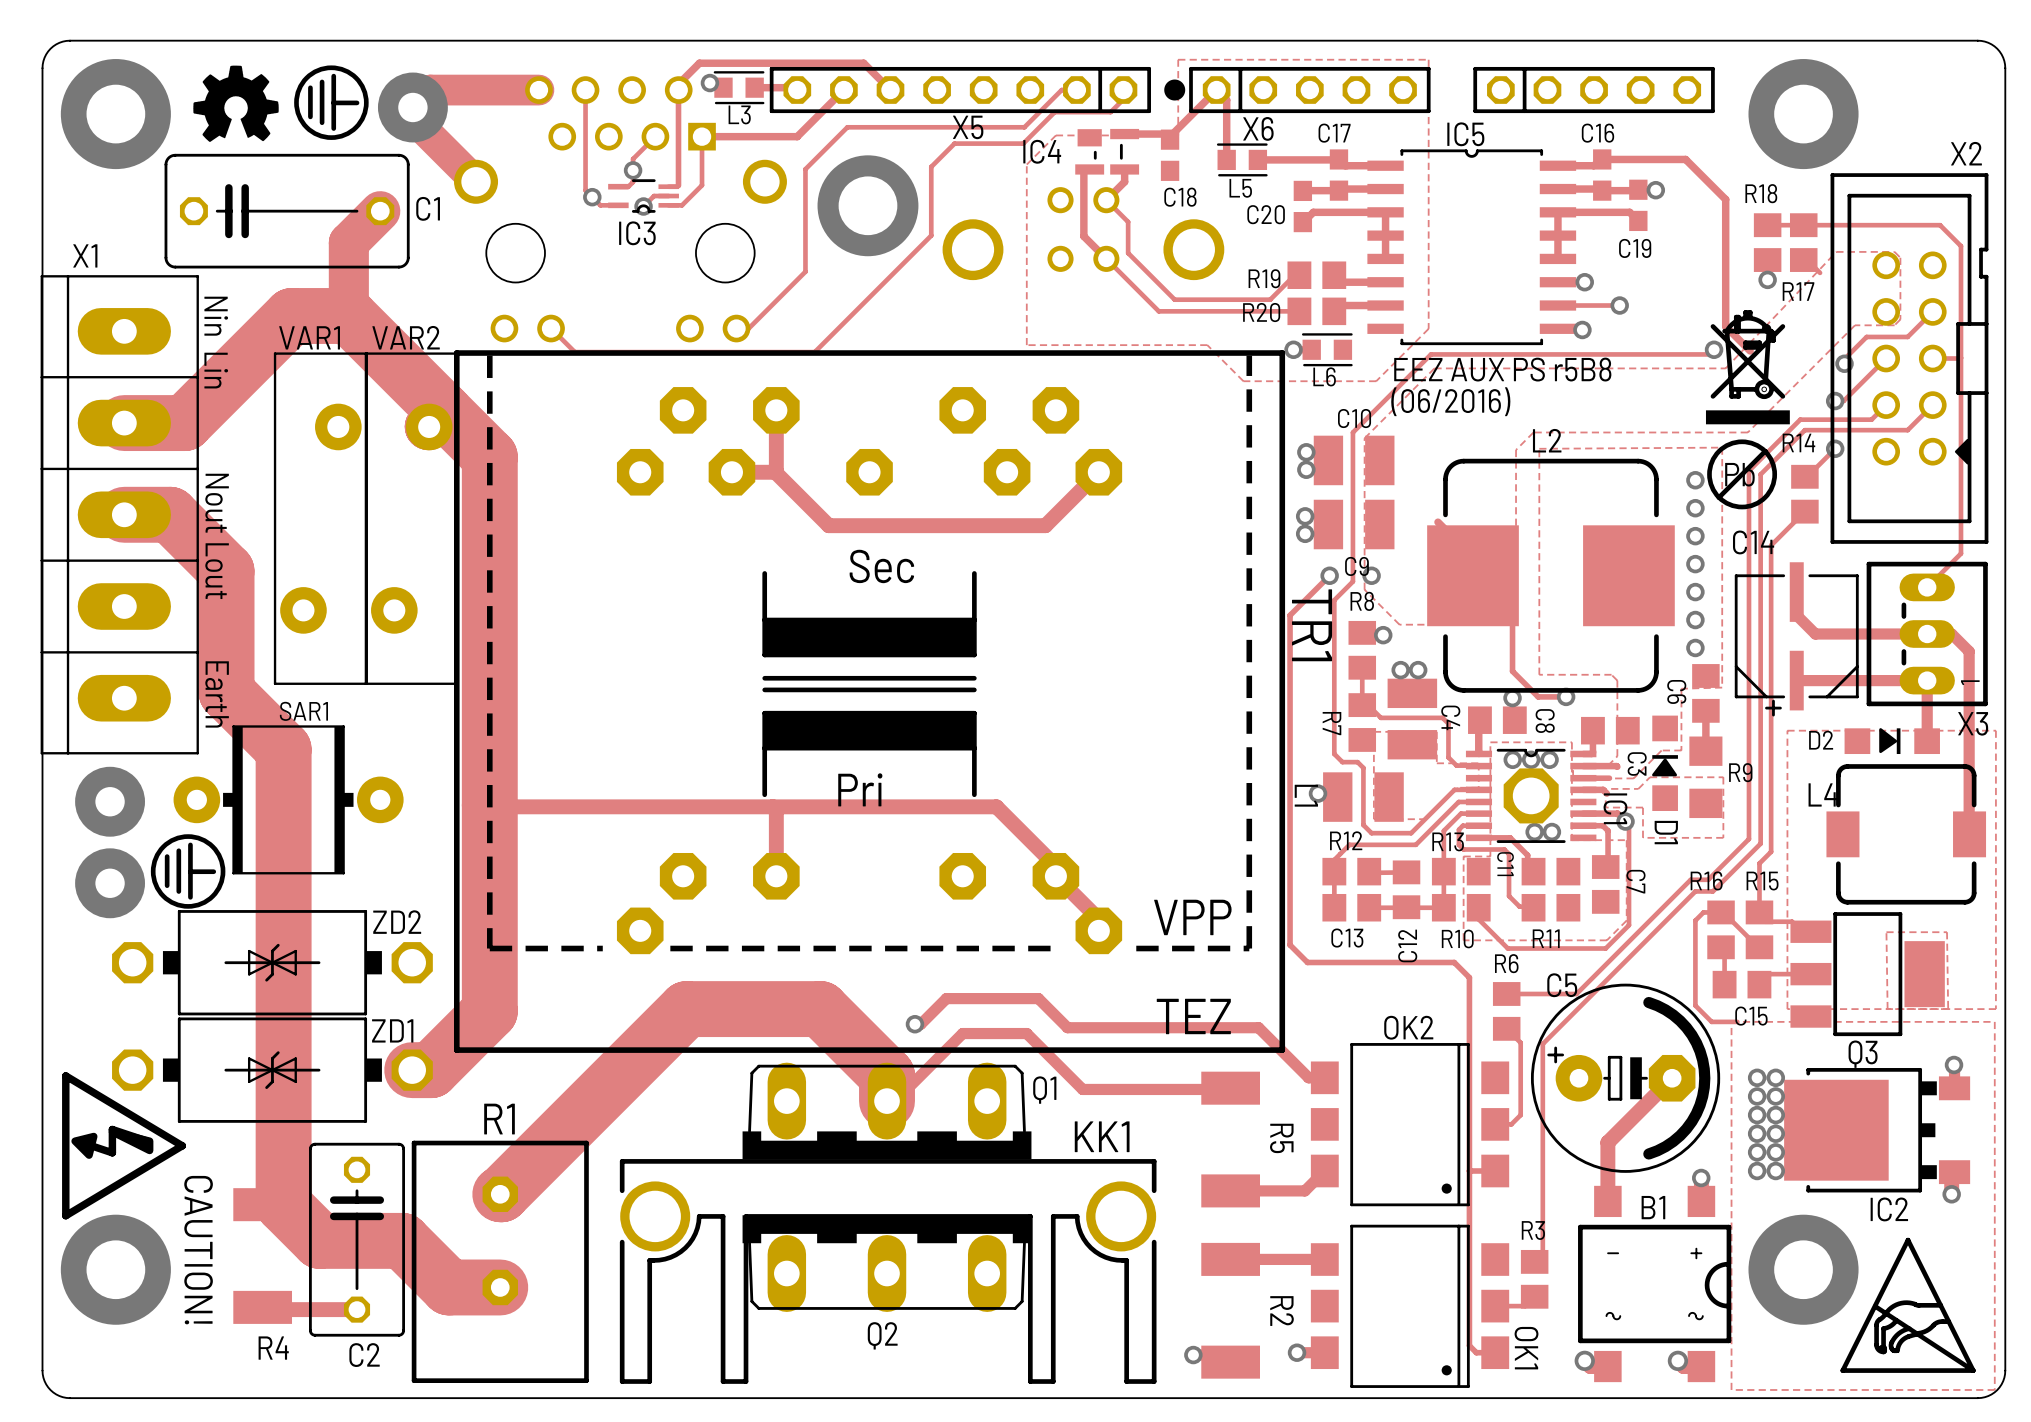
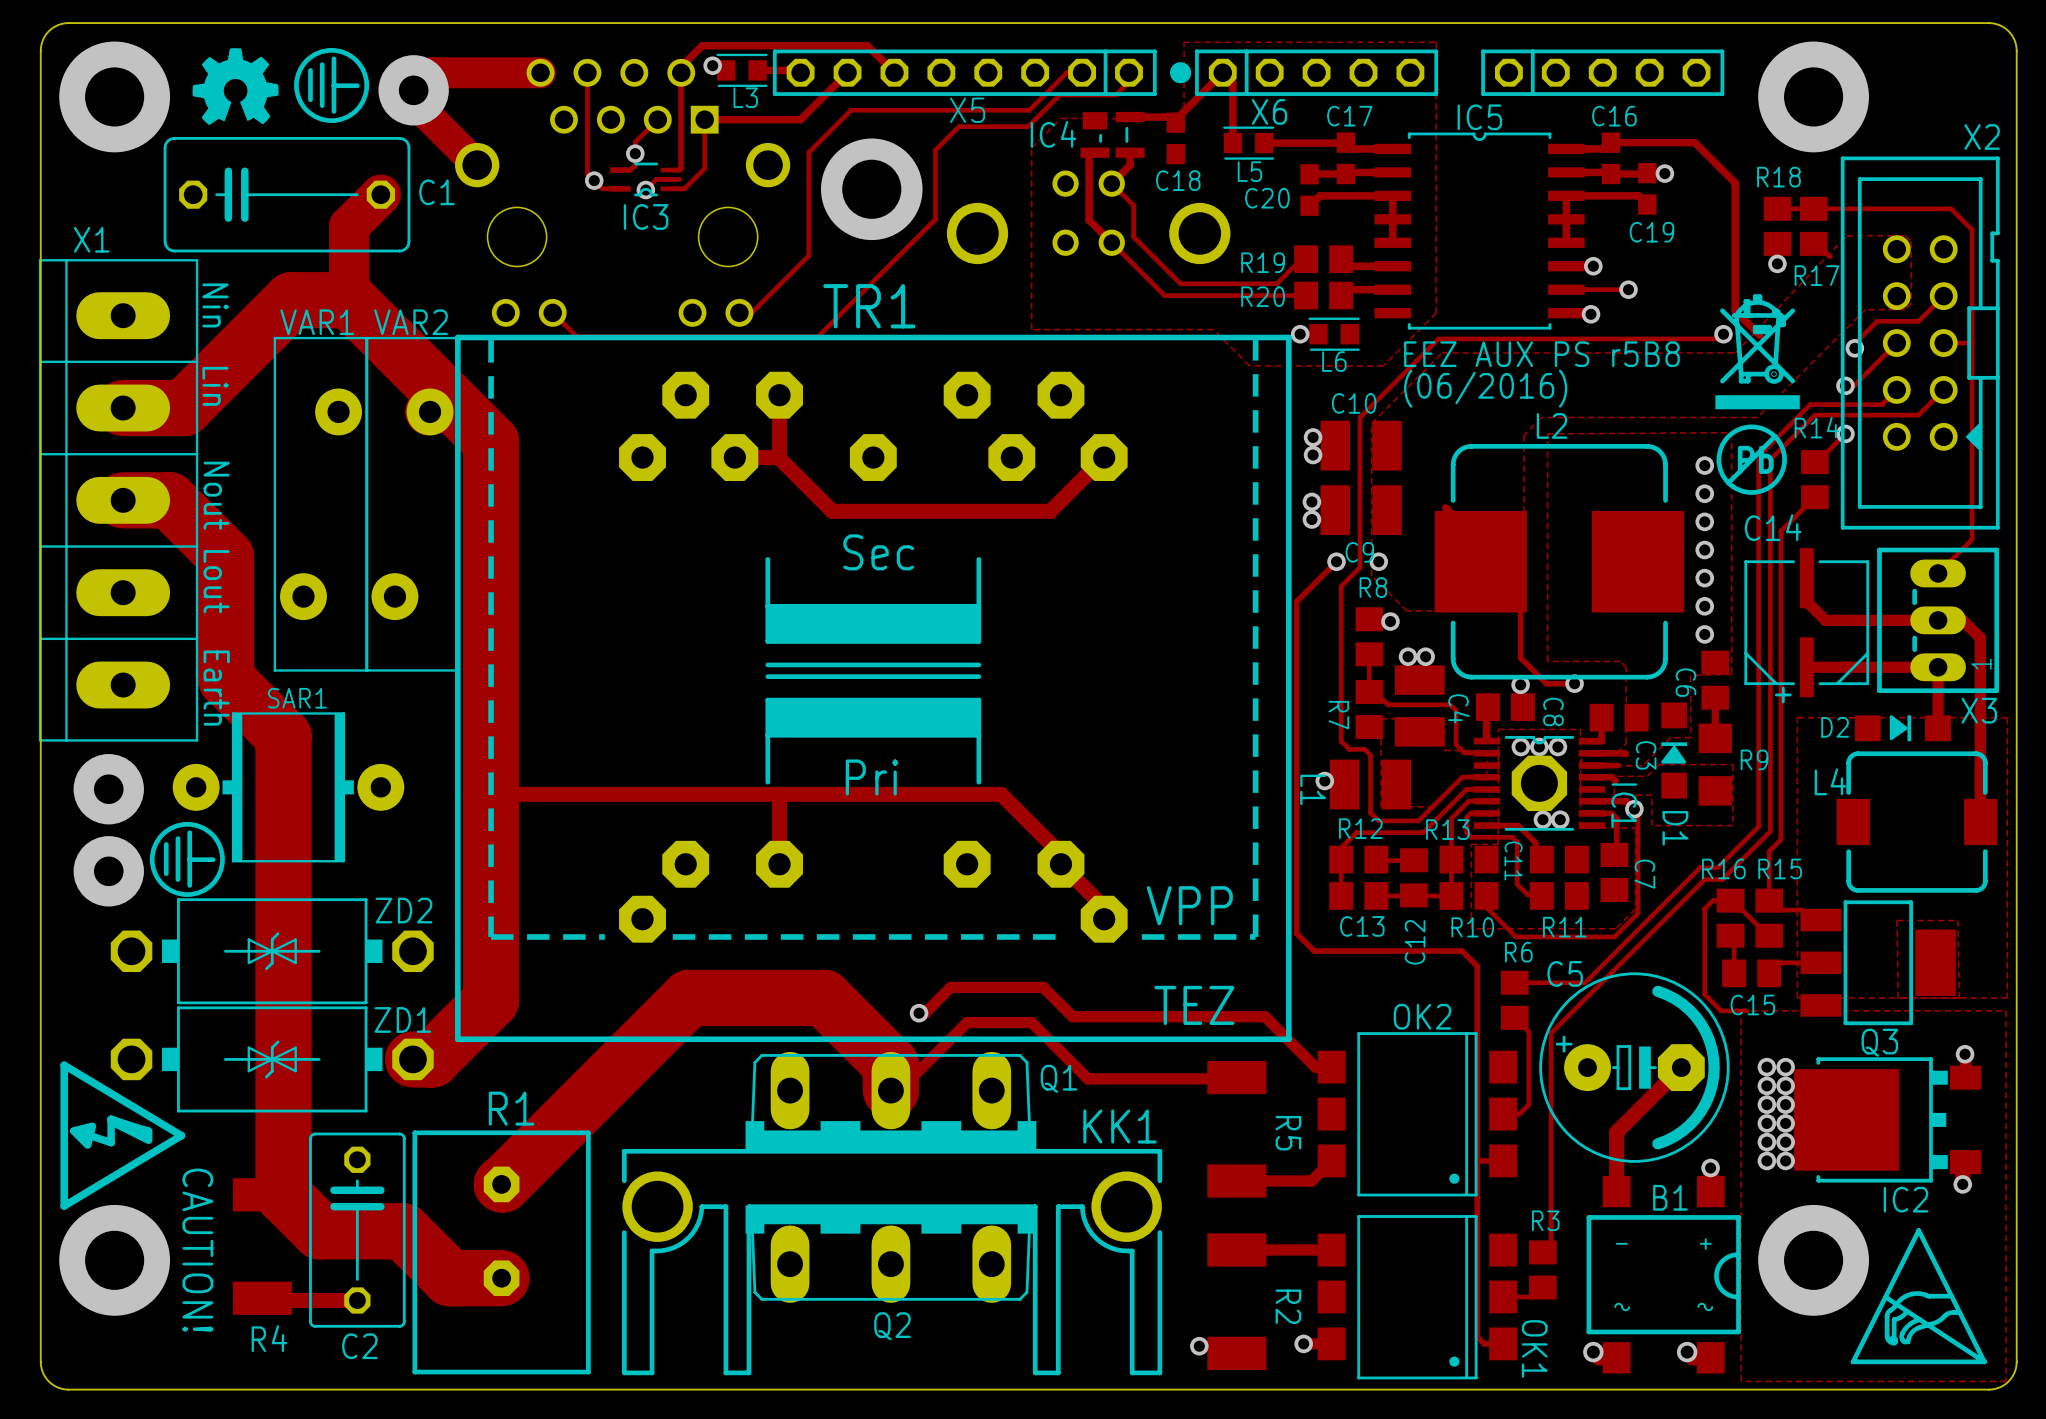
TR1 name rotation: 0° (1312, 625) -> 90° counterclockwise (869, 306)
TR1 name position: TR1 (1312, 625) -> TR1 (869, 306)

